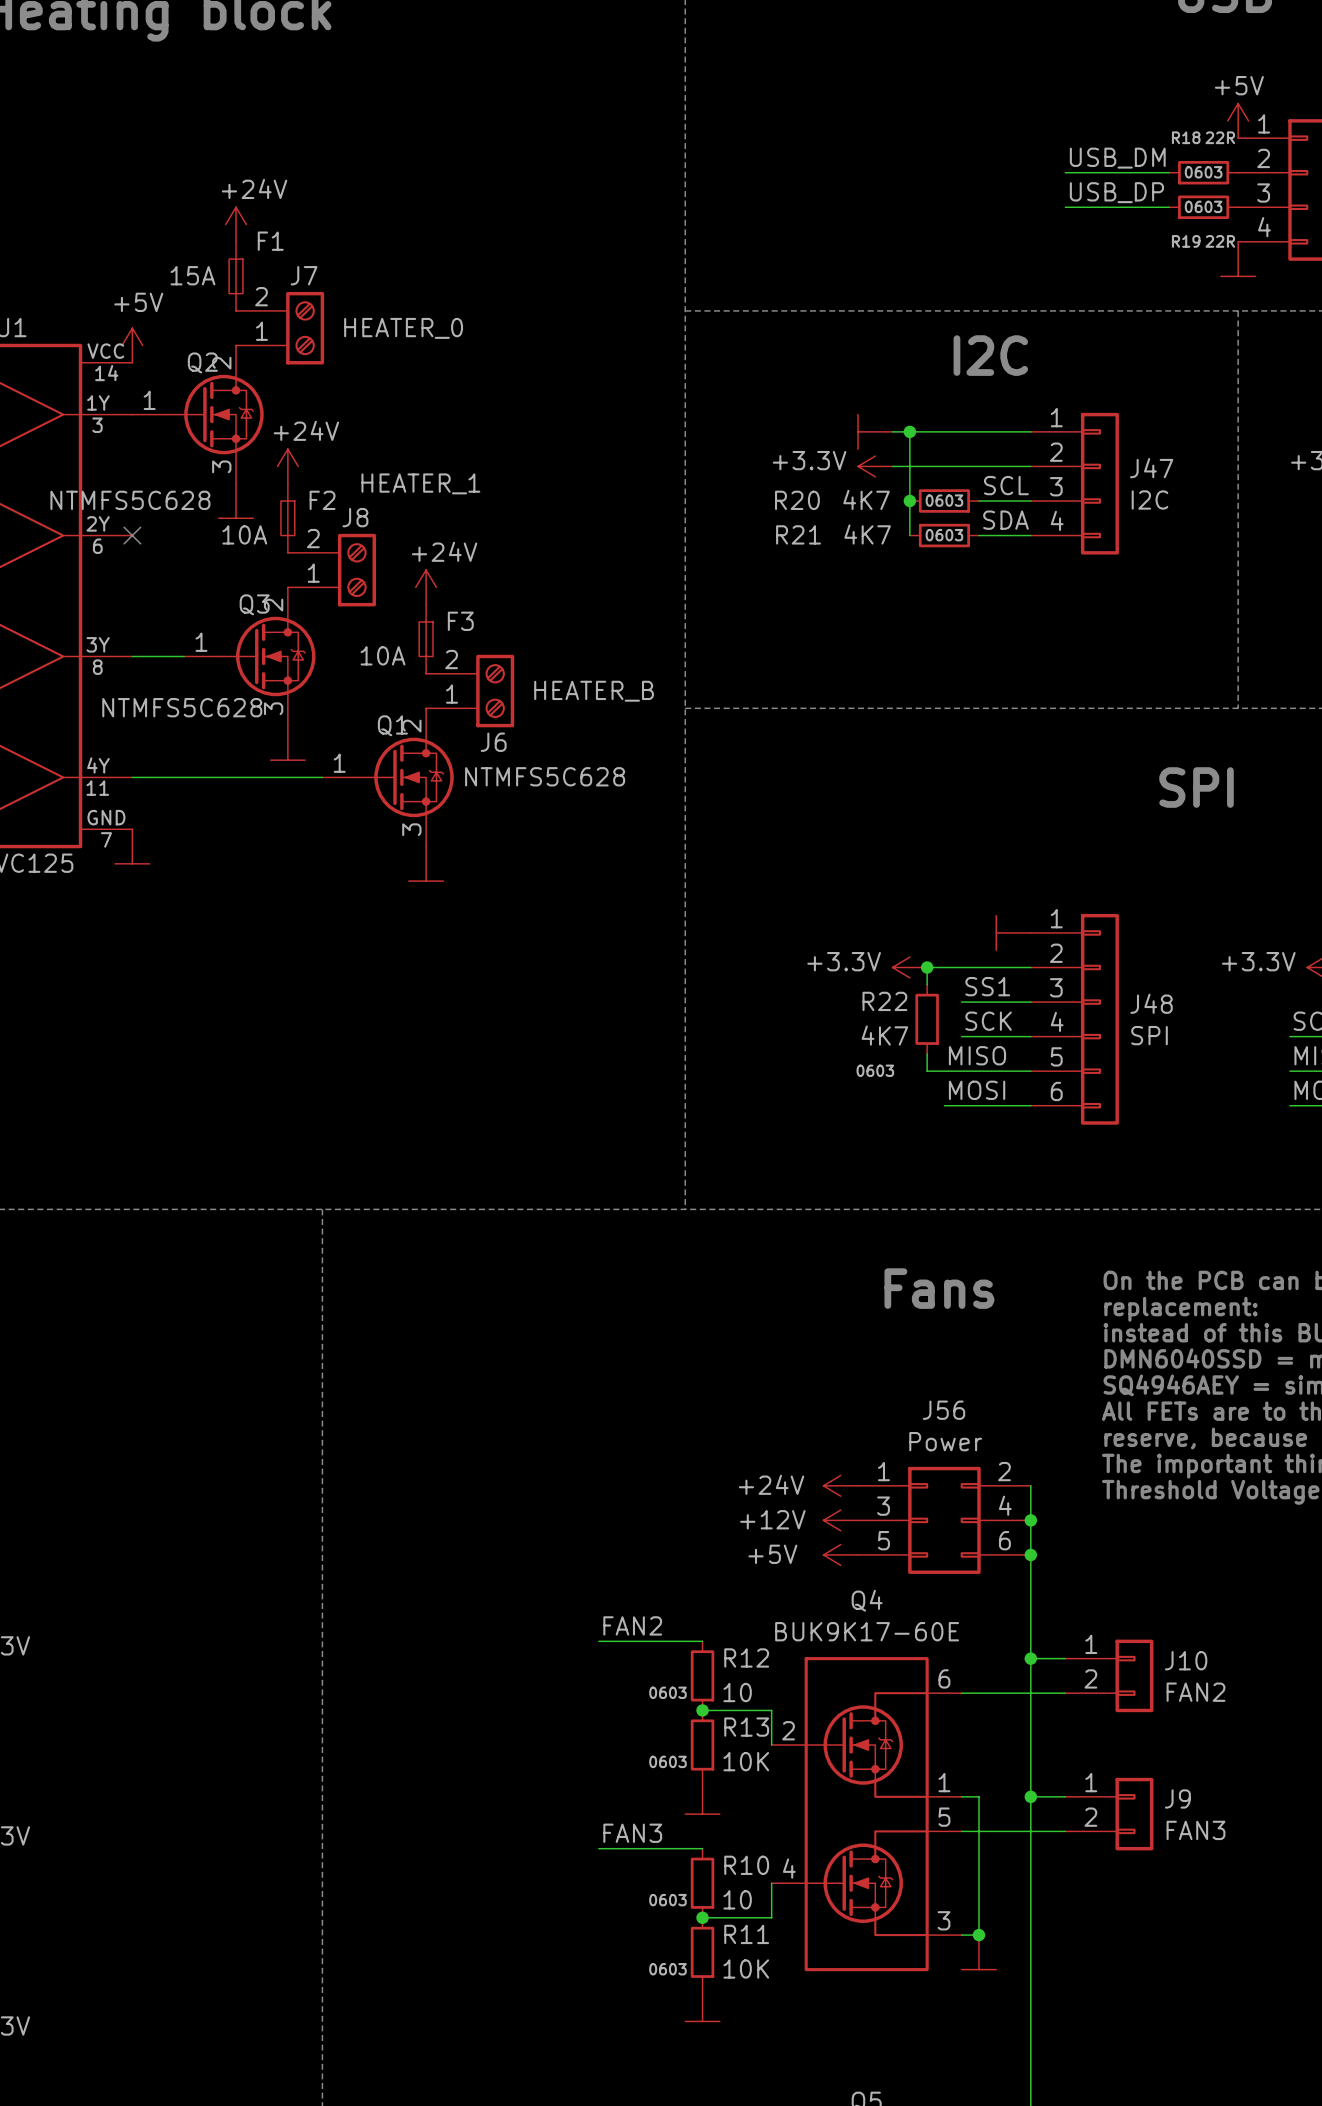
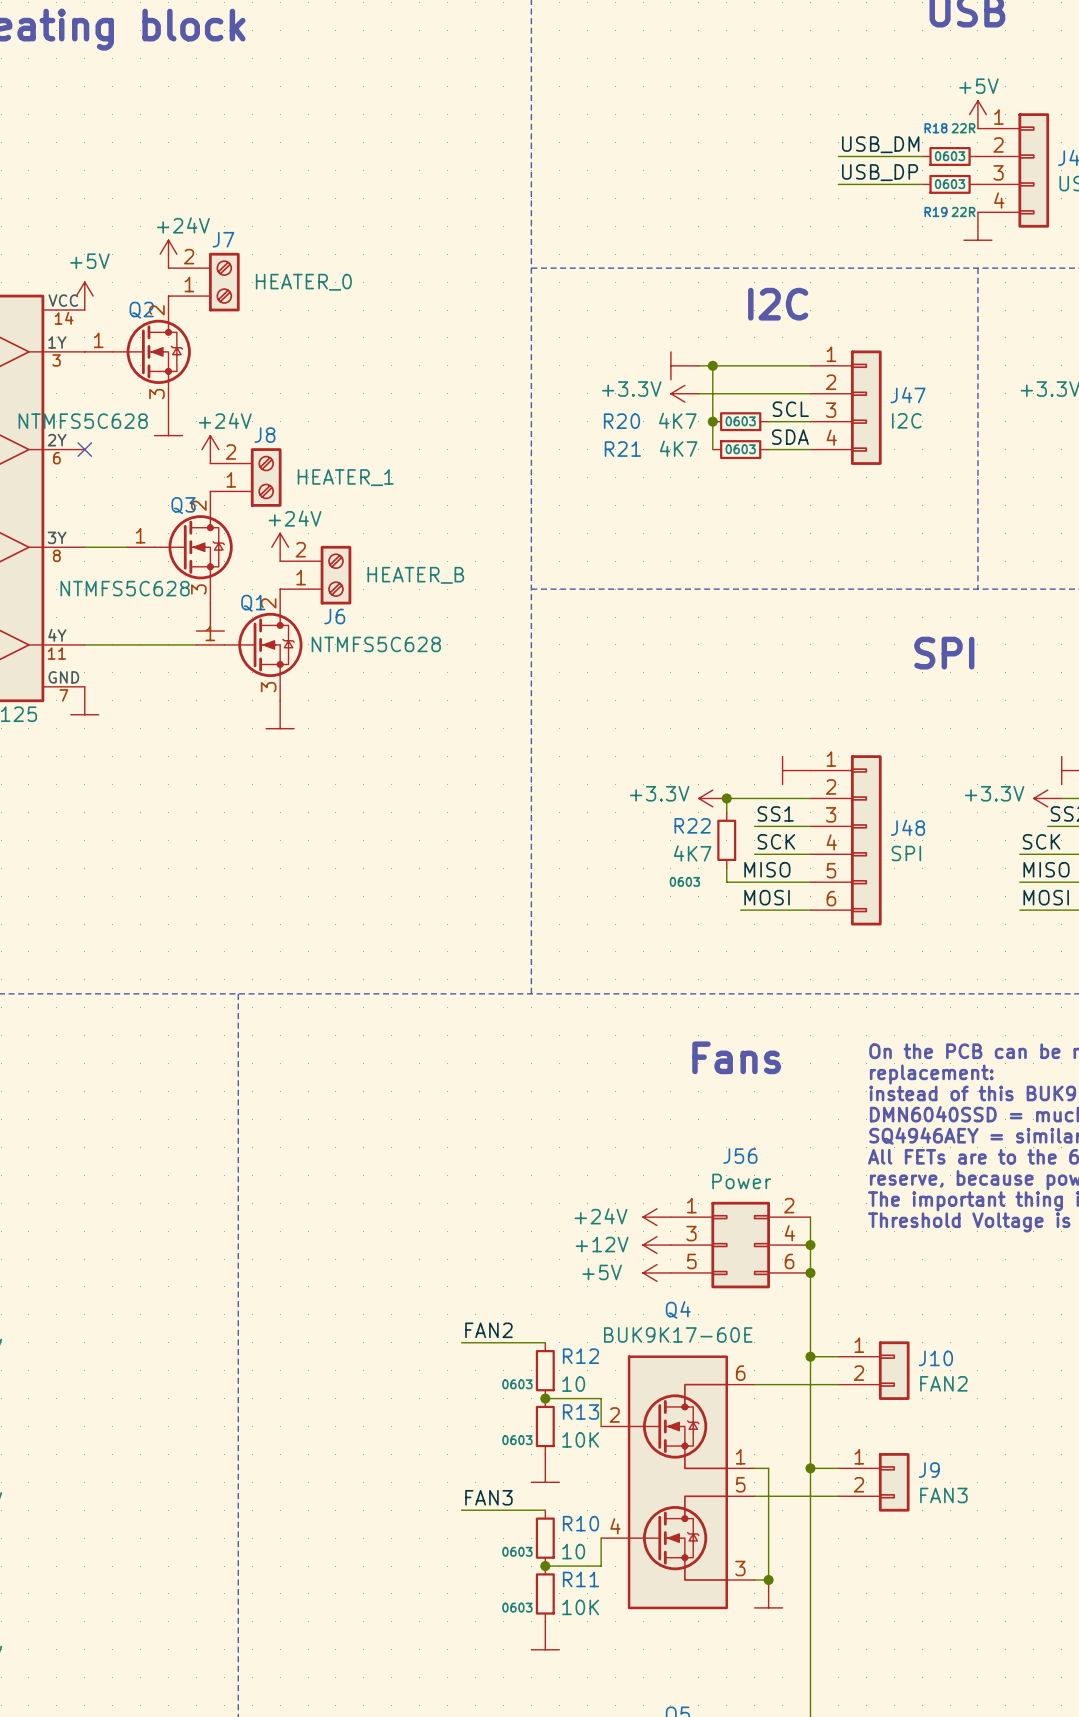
power symbol position: +24V (236, 224) -> +24V (168, 254)
F1: 15A (236, 276) -> none
power symbol position: +24V (287, 466) -> +24V (210, 449)
J8 value position: HEATER_1 (420, 483) -> HEATER_1 (345, 477)
F2: 10A (287, 518) -> none
power symbol: +24V (426, 587) -> none
F3: 10A (426, 639) -> none
power symbol: none -> +24V (280, 547)
J6 position: (470, 691) -> (315, 575)
Q1 position: (388, 777) -> (249, 644)
power symbol position: (426, 863) -> (280, 714)

